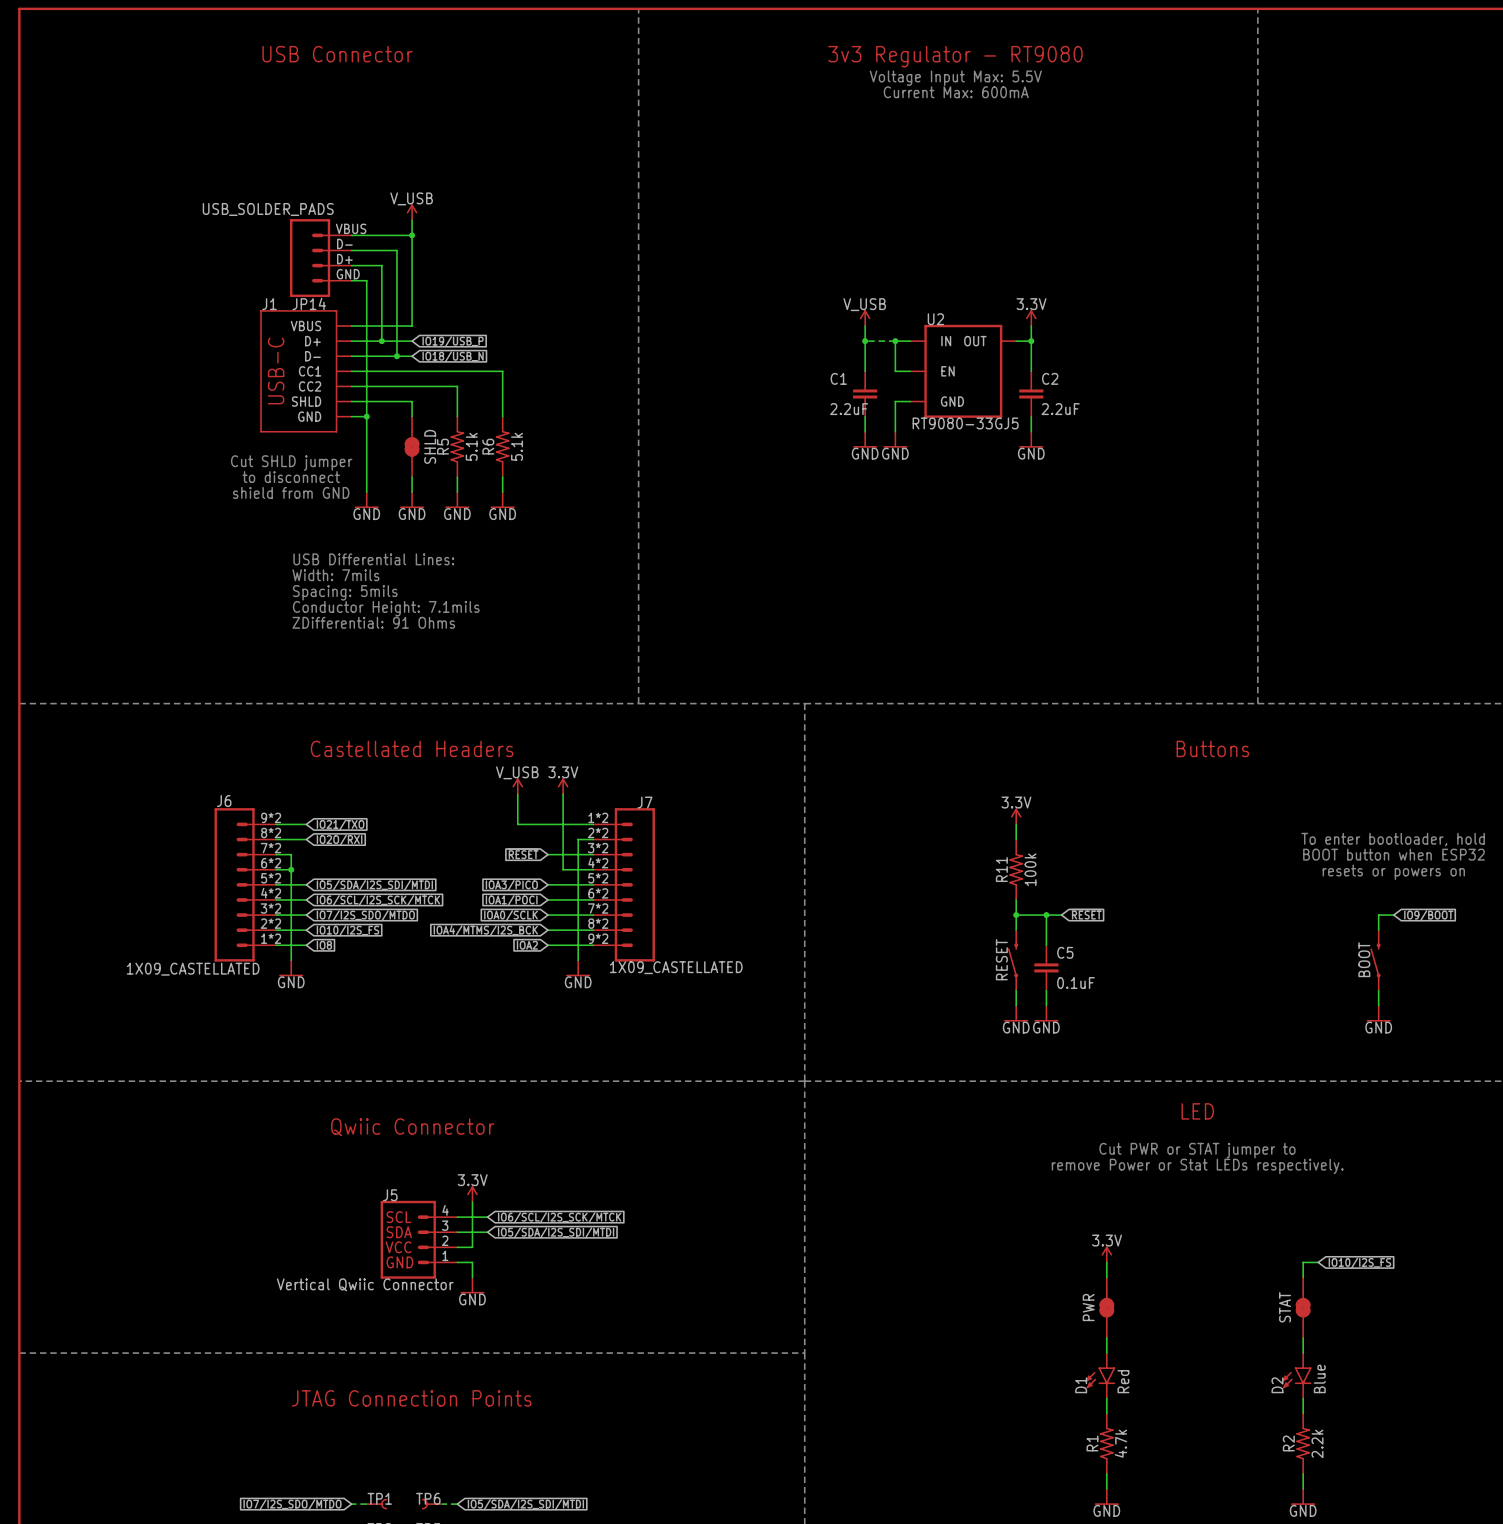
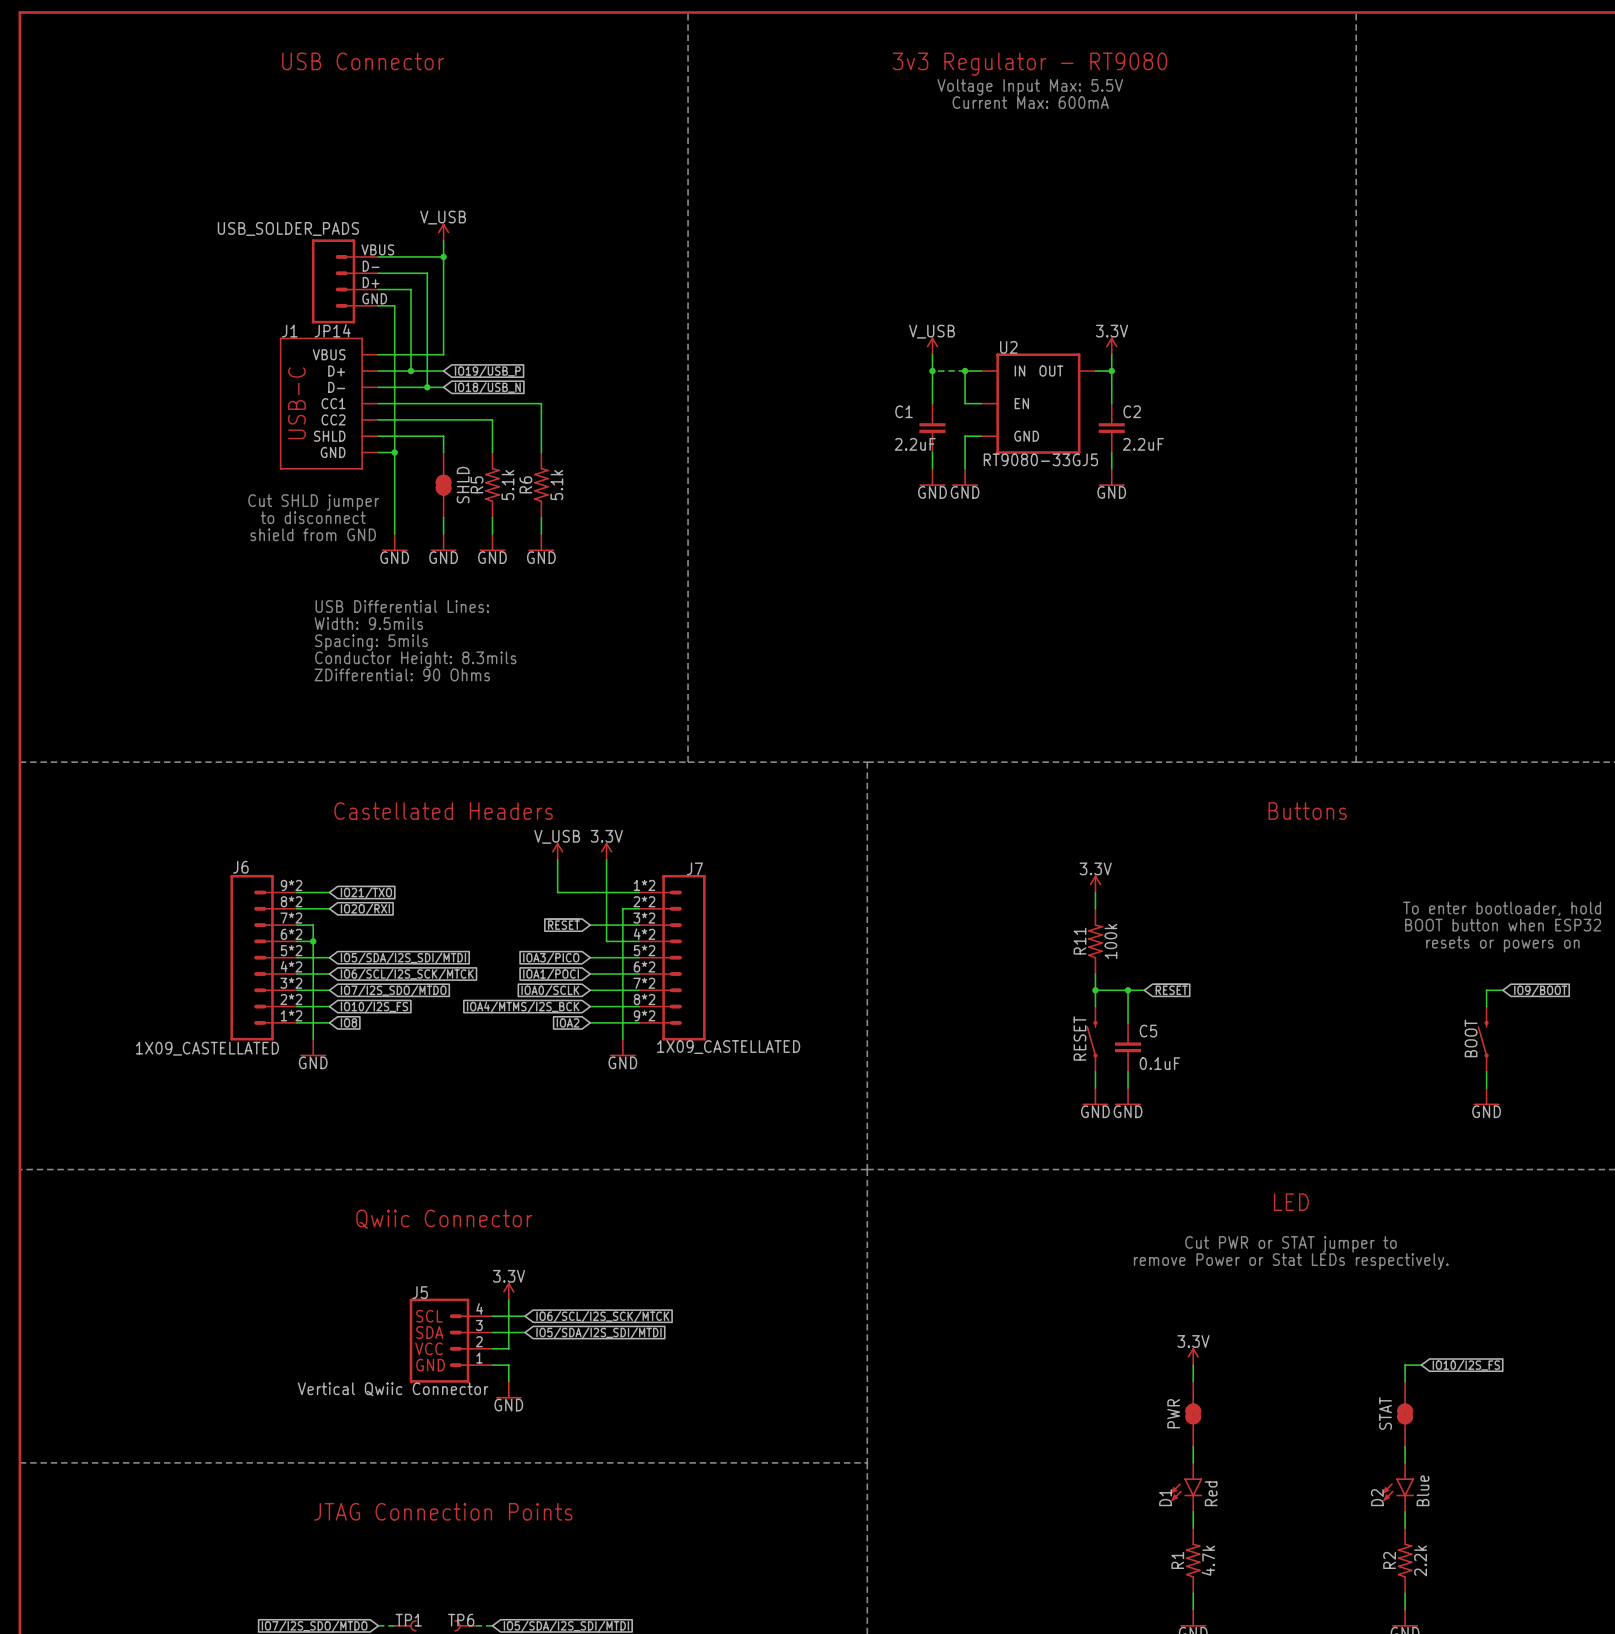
text: Width: 7mils (335, 575) -> Width: 9.5mils (368, 623)
text: Conductor Height: 7.1mils (386, 608) -> Conductor Height: 8.3mils (415, 659)
text: ZDifferential: 91 Ohms (373, 622) -> ZDifferential: 90 Ohms (402, 674)

